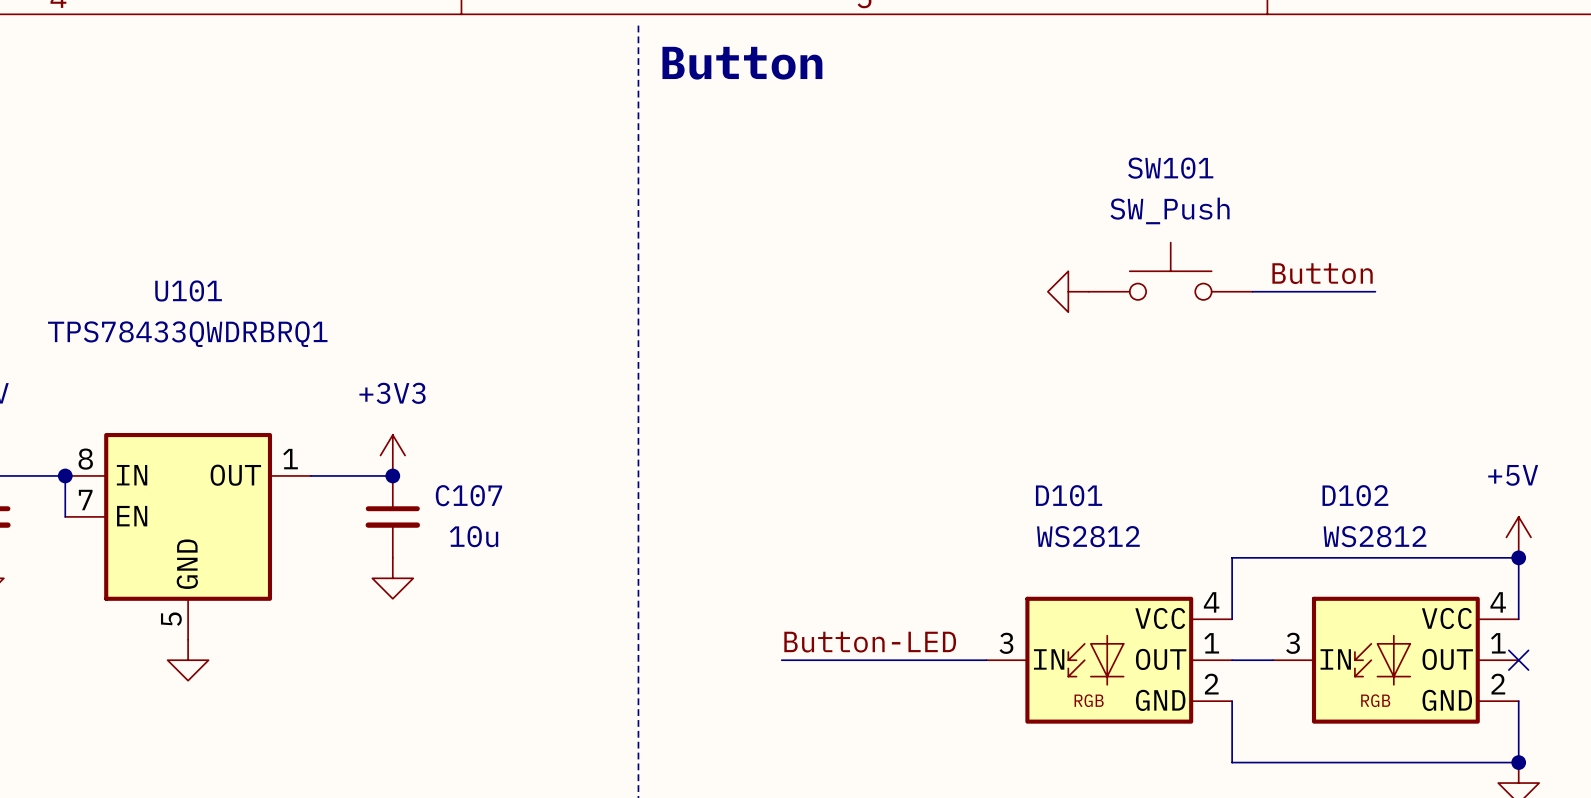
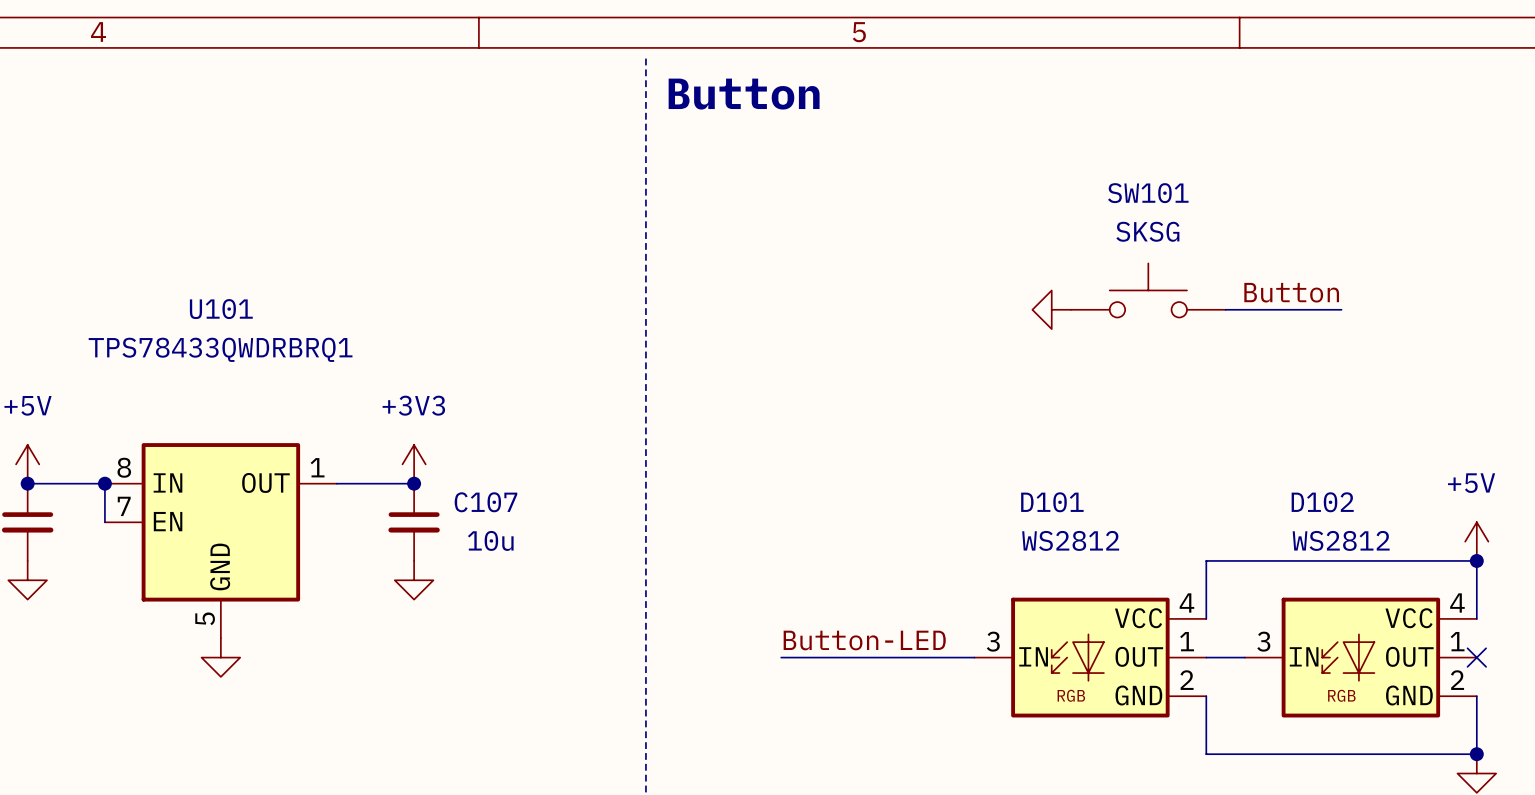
SW101 value: SW_Push (1170, 210) -> SKSG (1147, 231)

